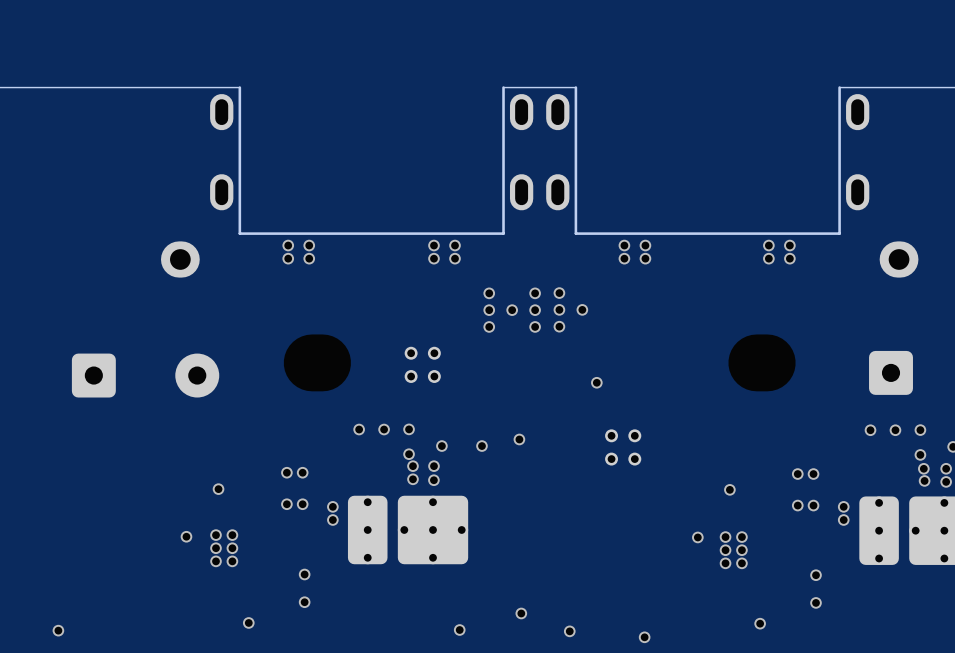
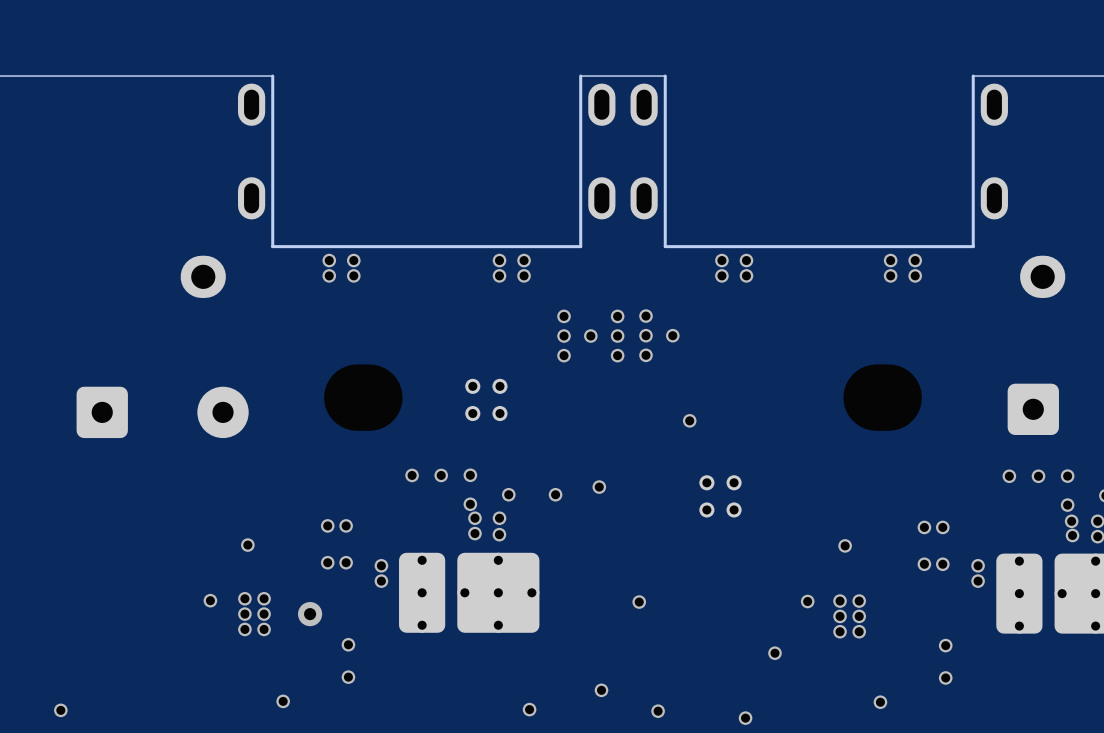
via: none -> (639, 602)
via: none -> (310, 614)
via: none -> (774, 653)

